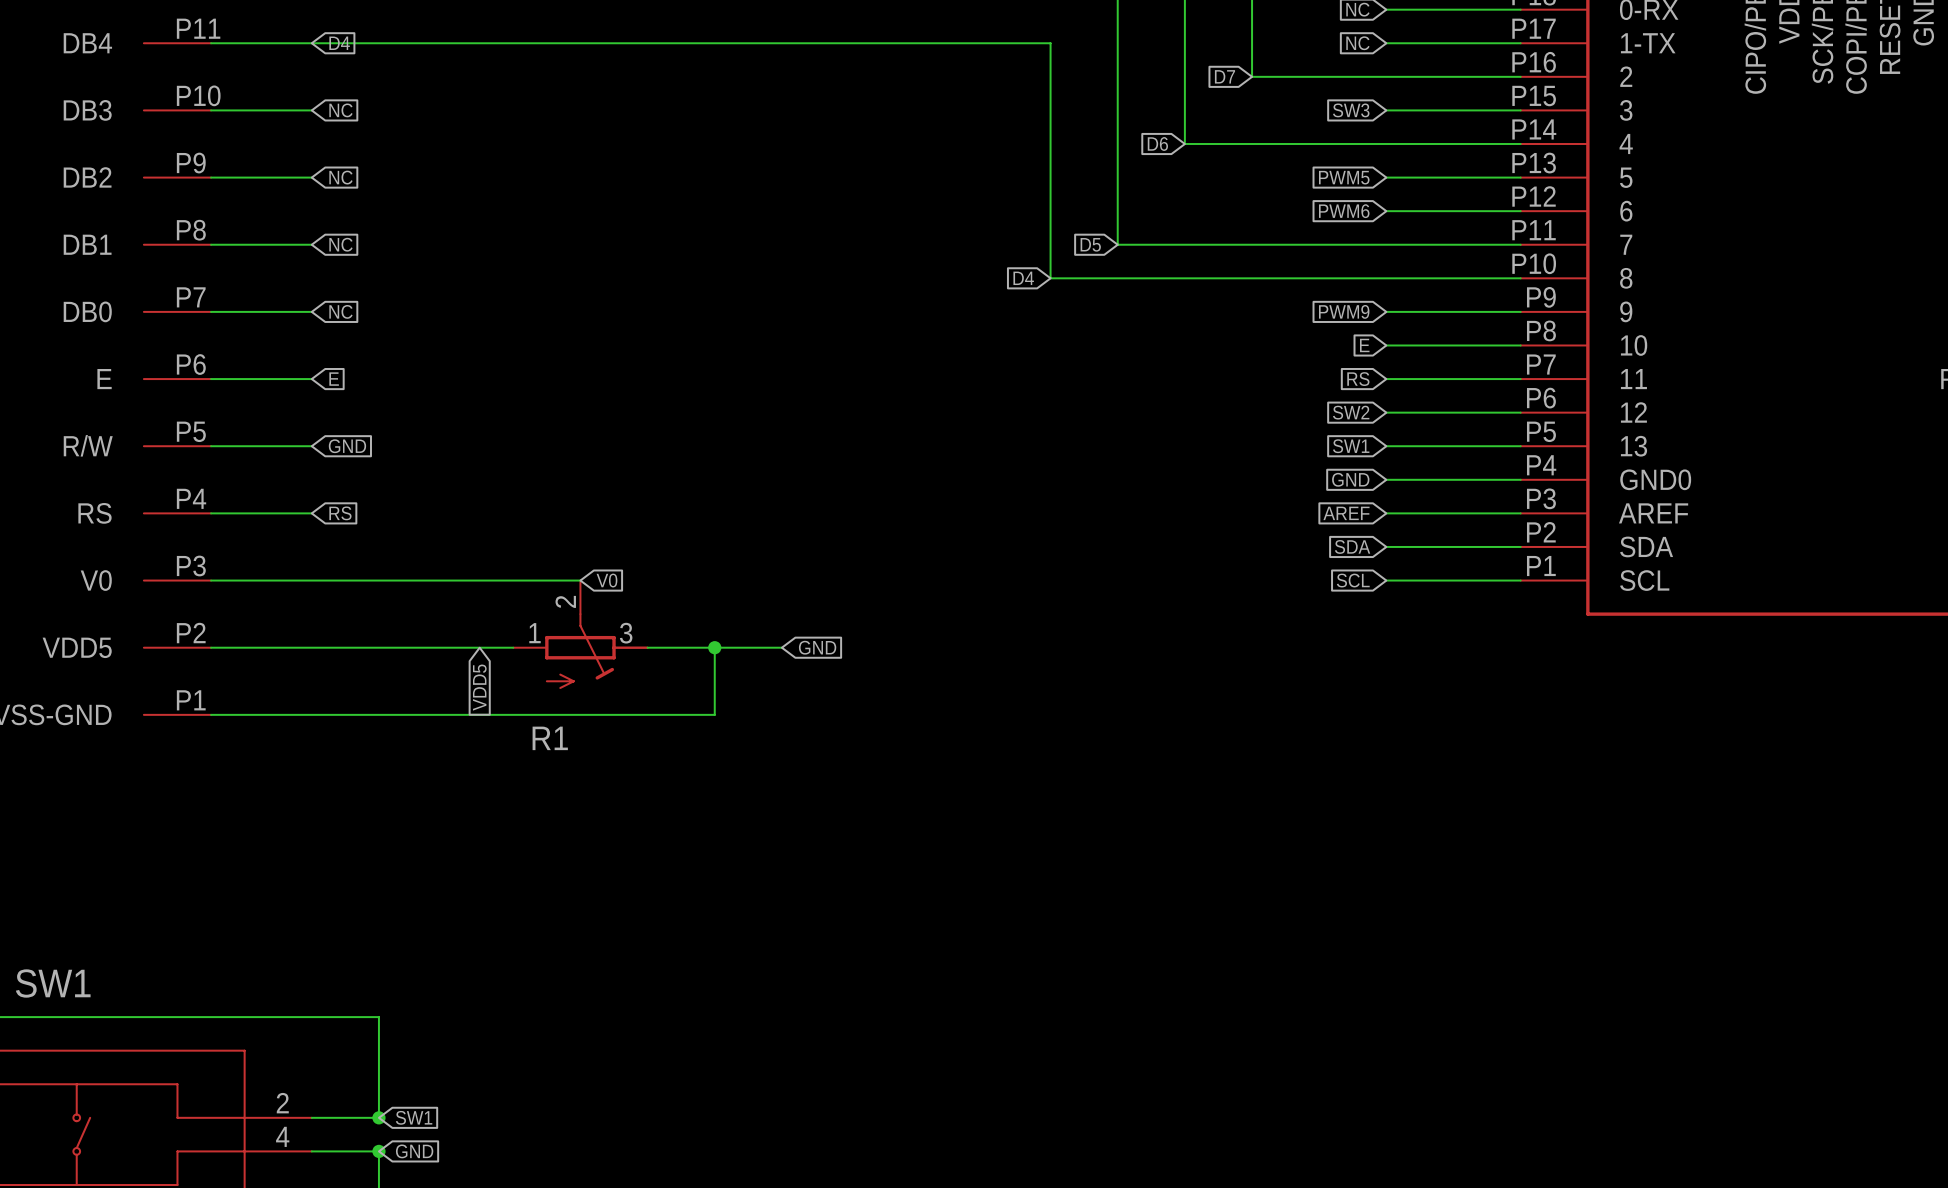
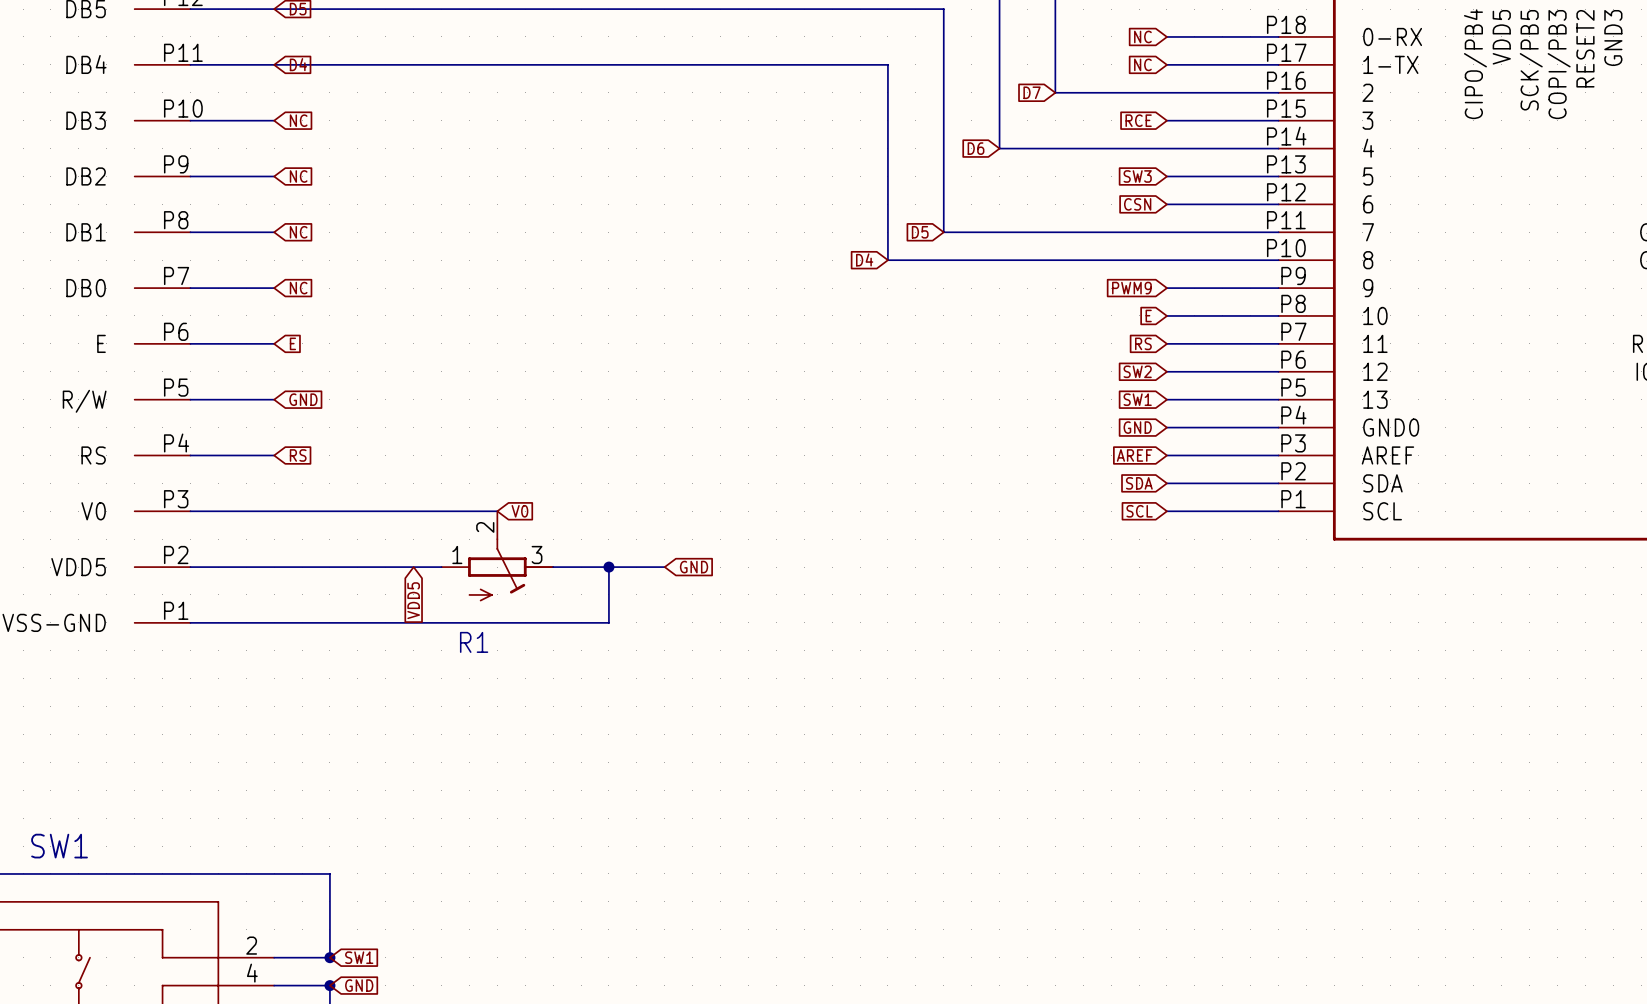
global label: SW3 (1351, 110) -> RCE (1138, 120)
global label: PWM5 (1344, 177) -> SW3 (1137, 176)
global label: PWM6 (1344, 211) -> CSN (1137, 204)

